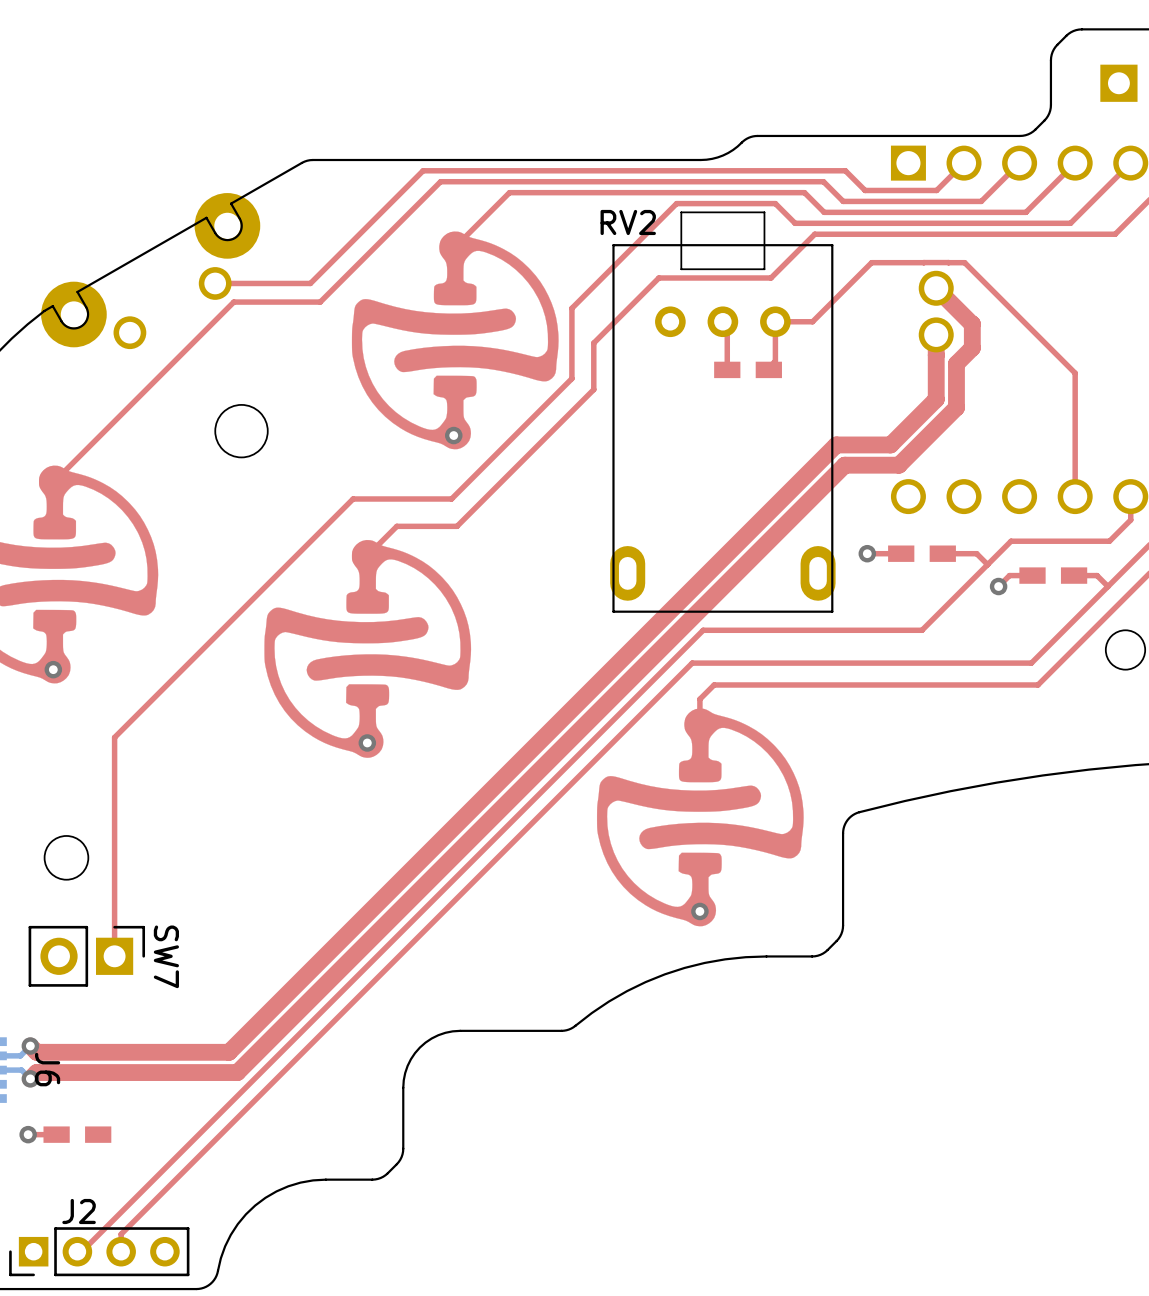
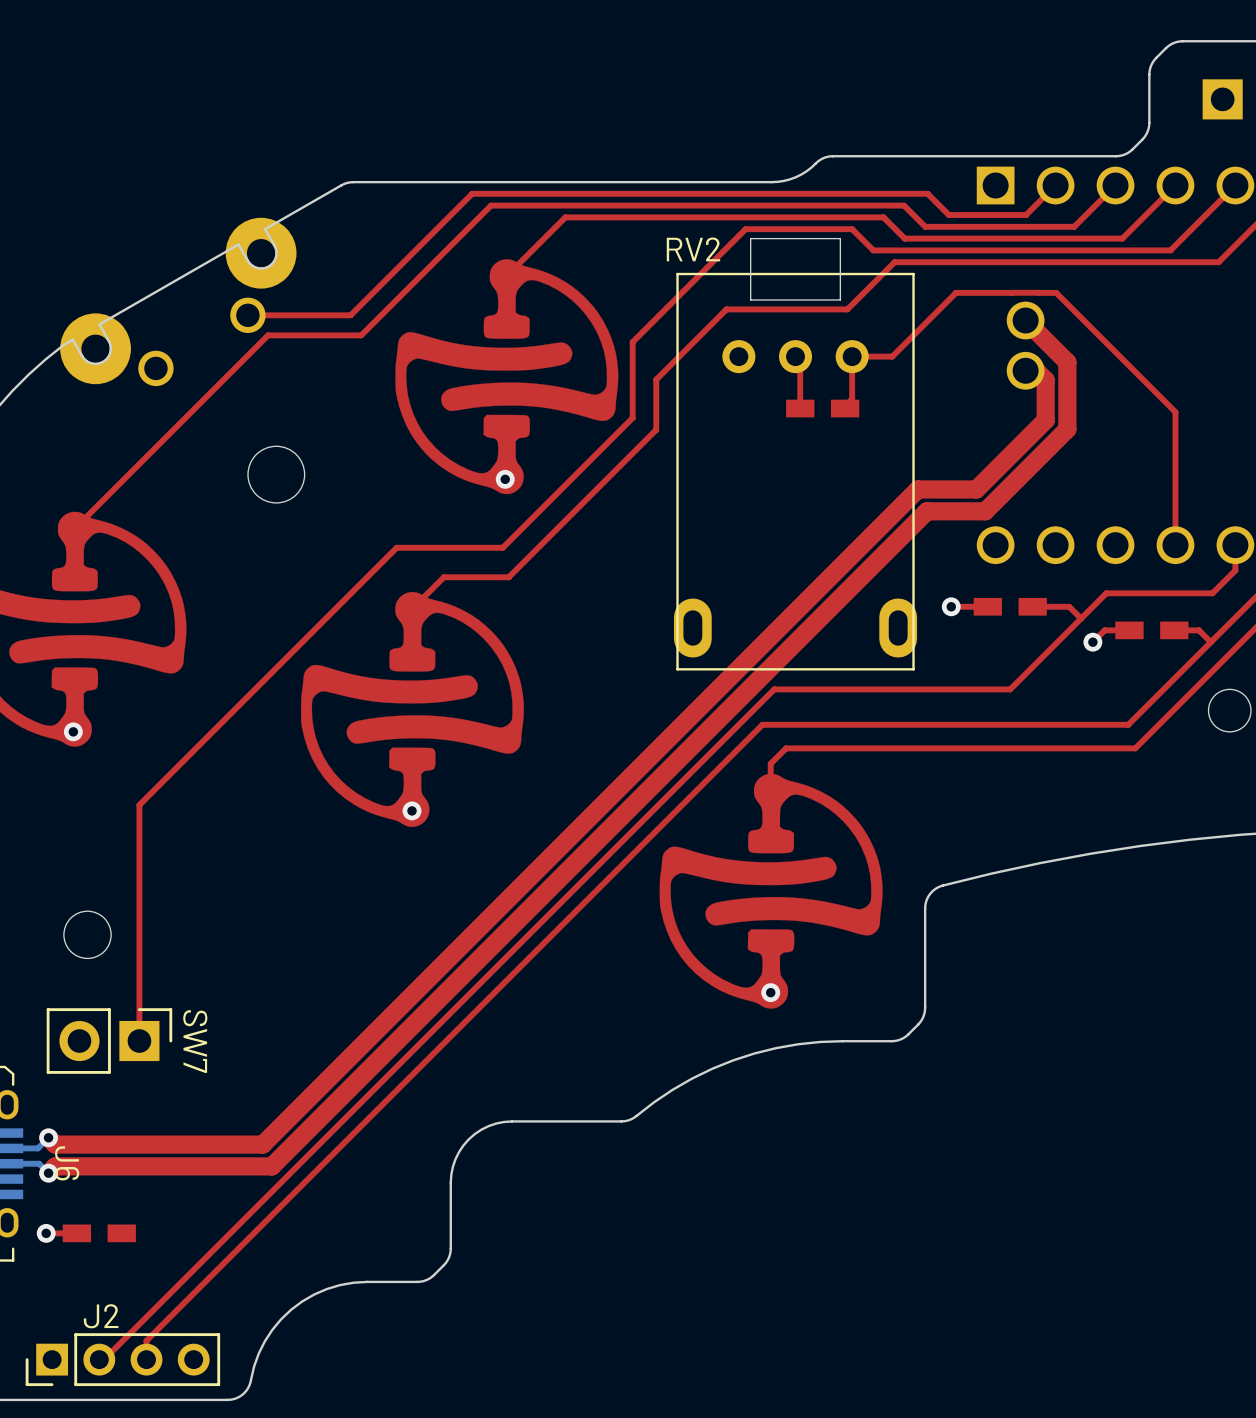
top track: (972, 323) (972, 348) (956, 363) (956, 407) (899, 465) -> (1064, 358) (1067, 362) (1067, 429) (985, 511)
top track: (936, 334) (936, 399) -> (1025, 370) (1036, 370) (1045, 380) (1045, 420) (1025, 440)

